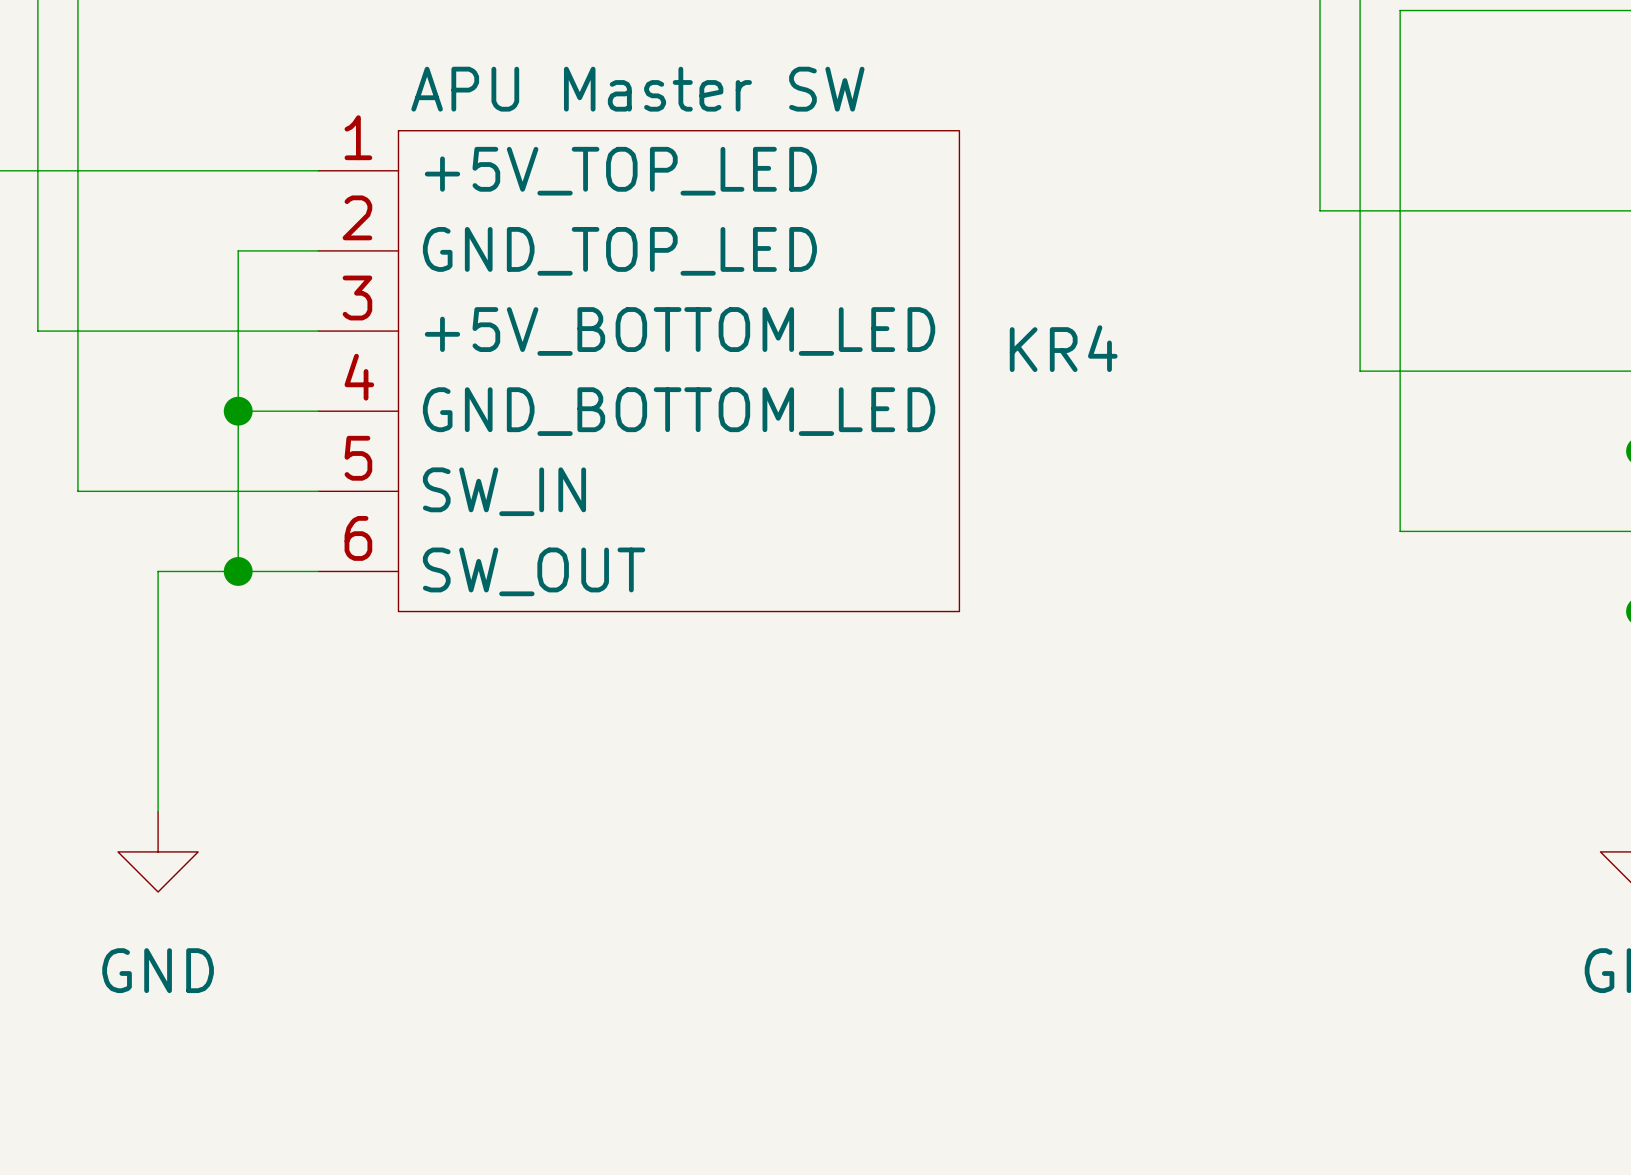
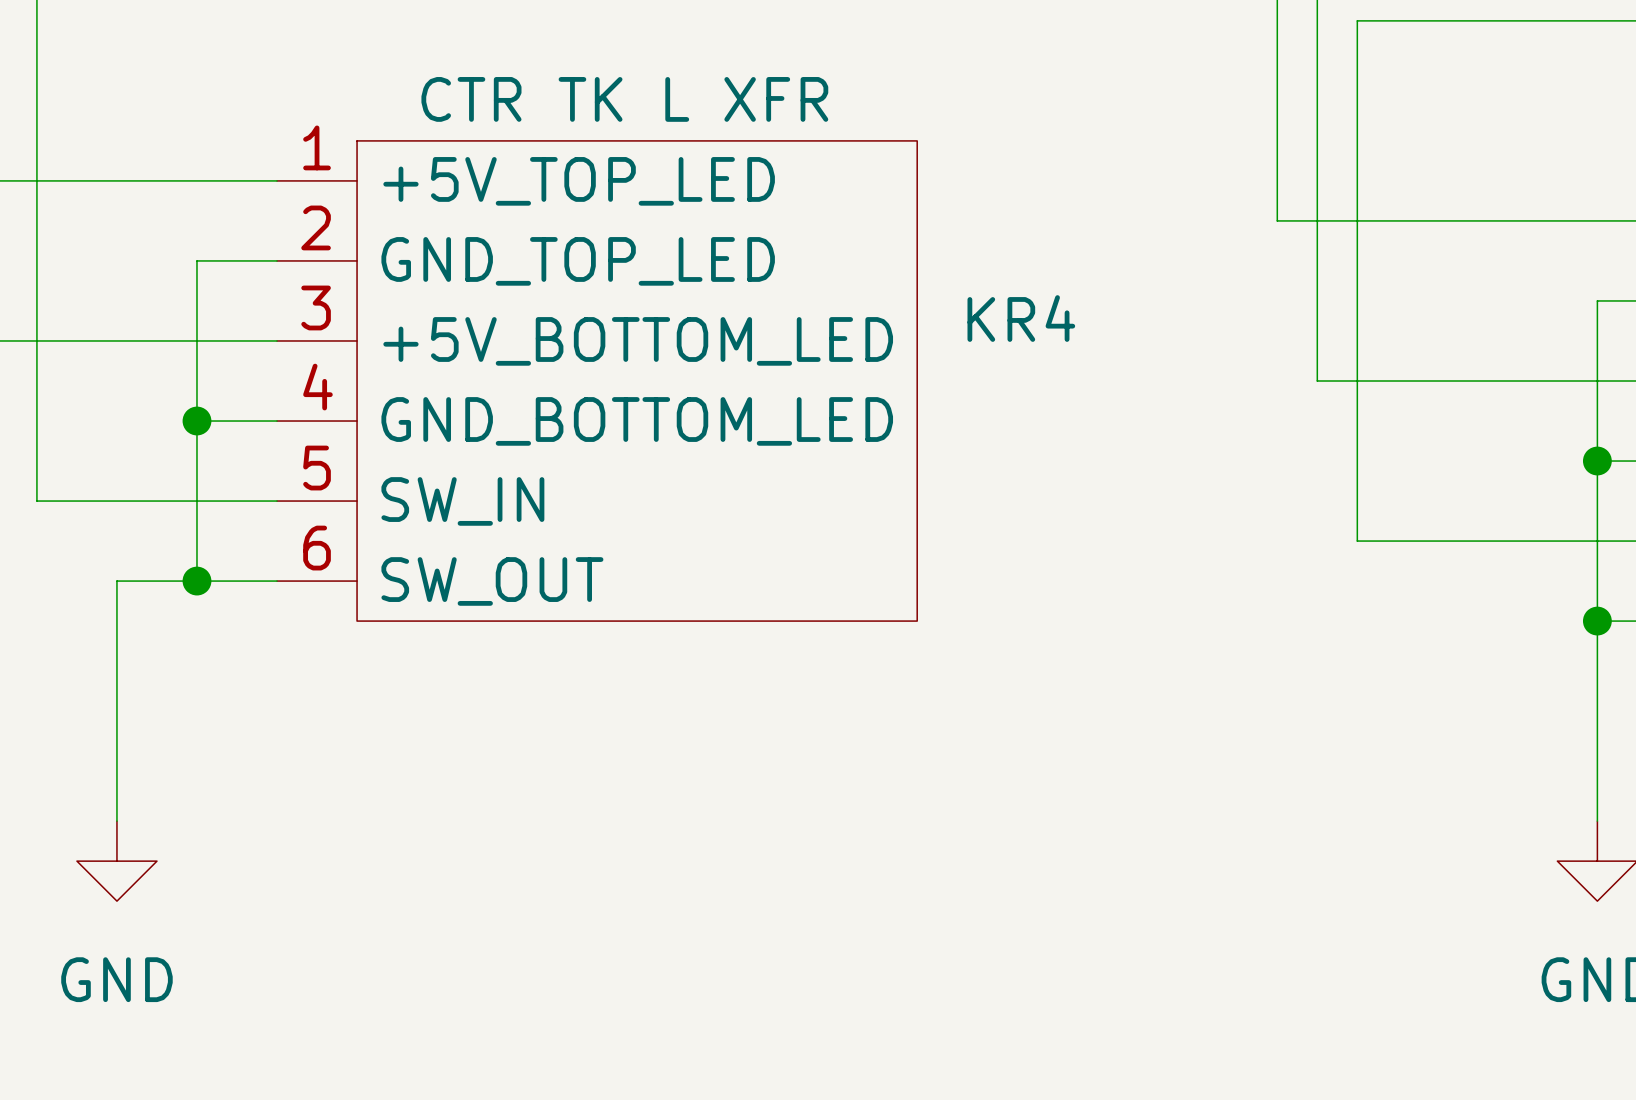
KR4 text: APU Master SW (637, 89) -> CTR TK L XFR (624, 99)
KR4 name position: KR4 (1063, 348) -> KR4 (1021, 318)

